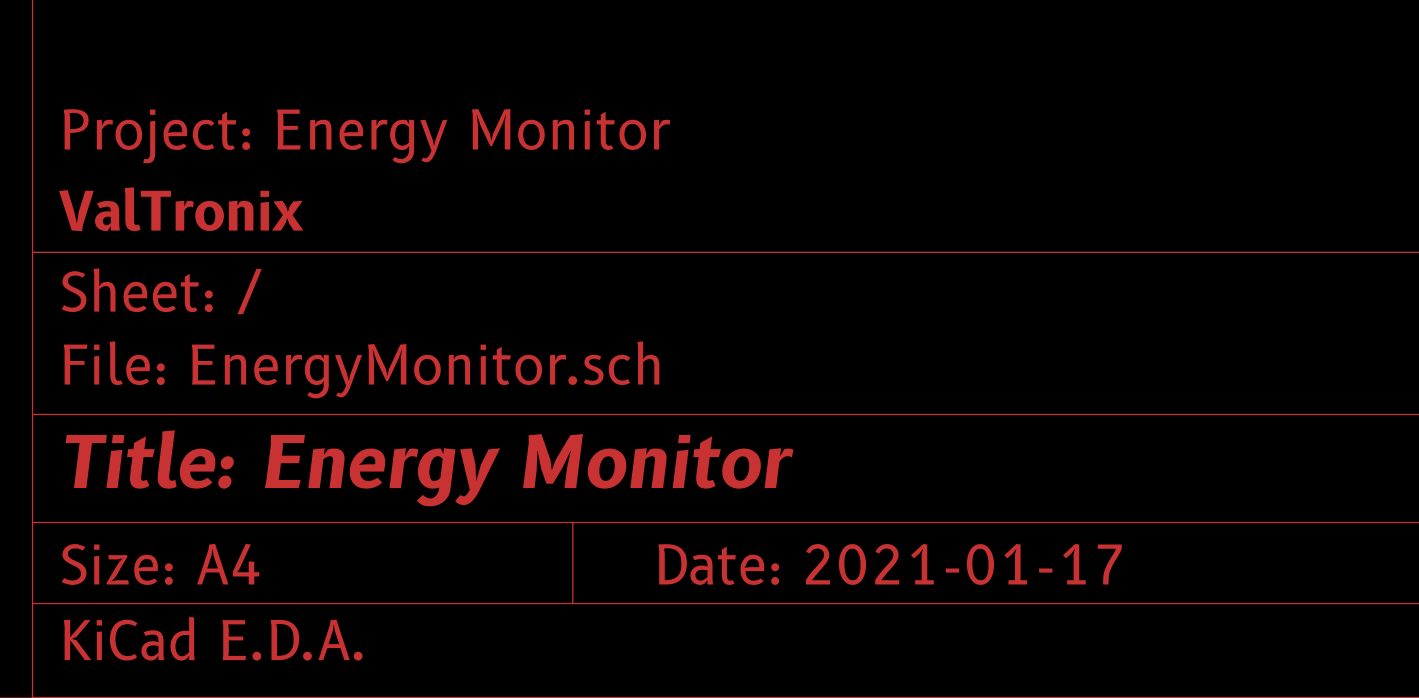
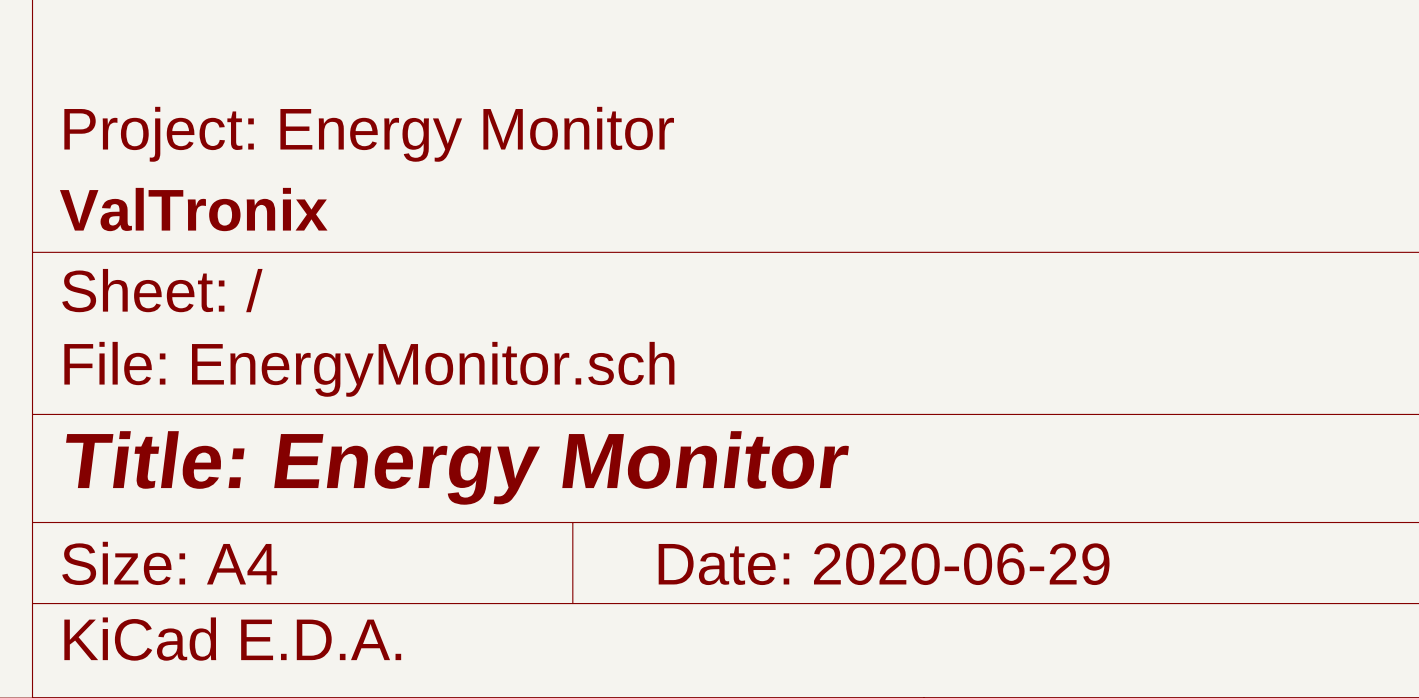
title block: Date: 2021-01-17 (890, 564) -> Date: 2020-06-29 (884, 564)

